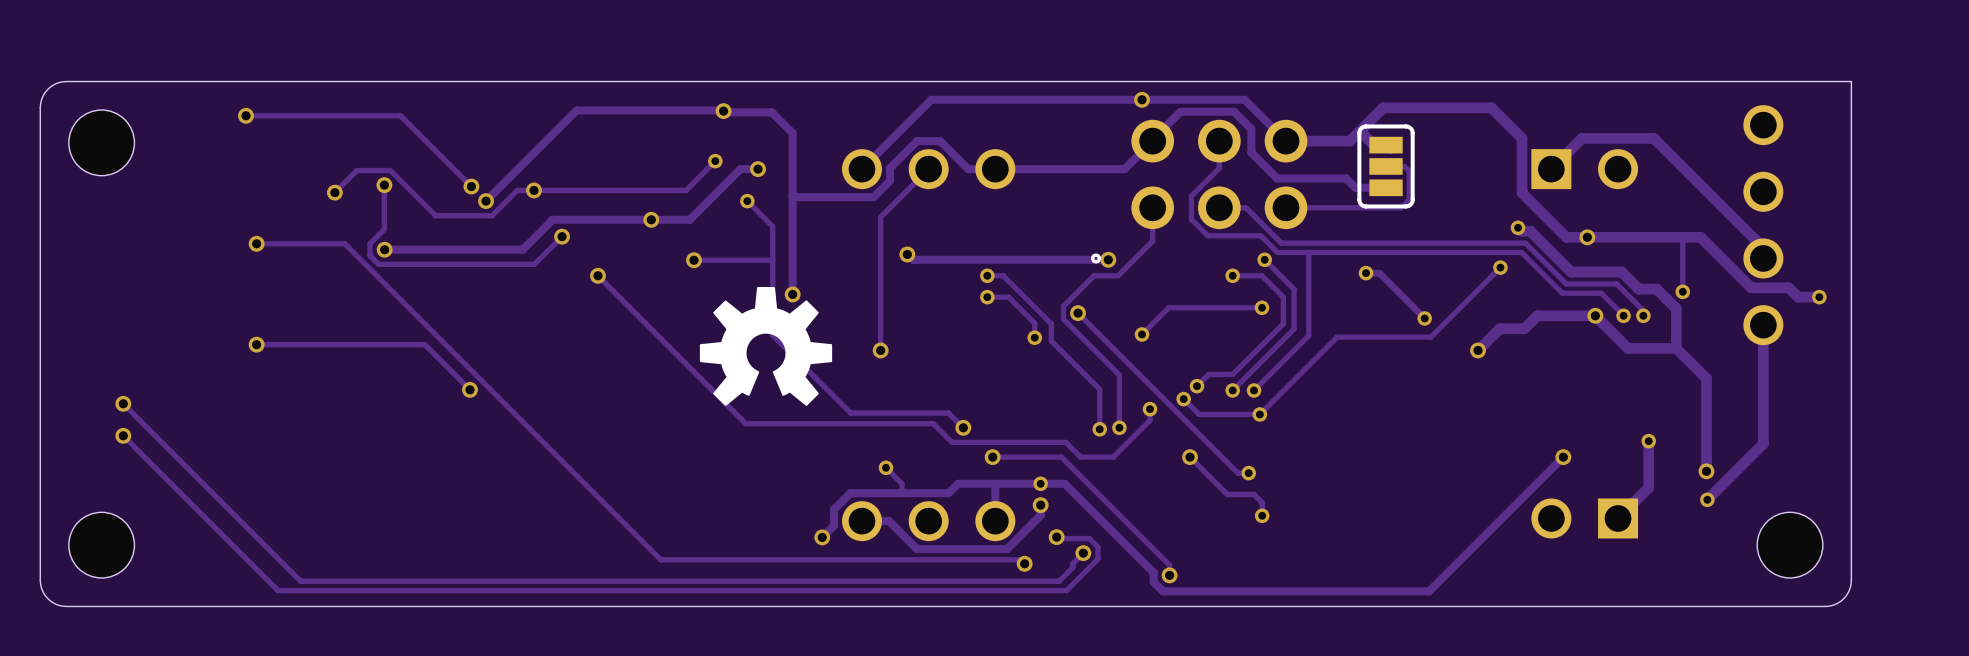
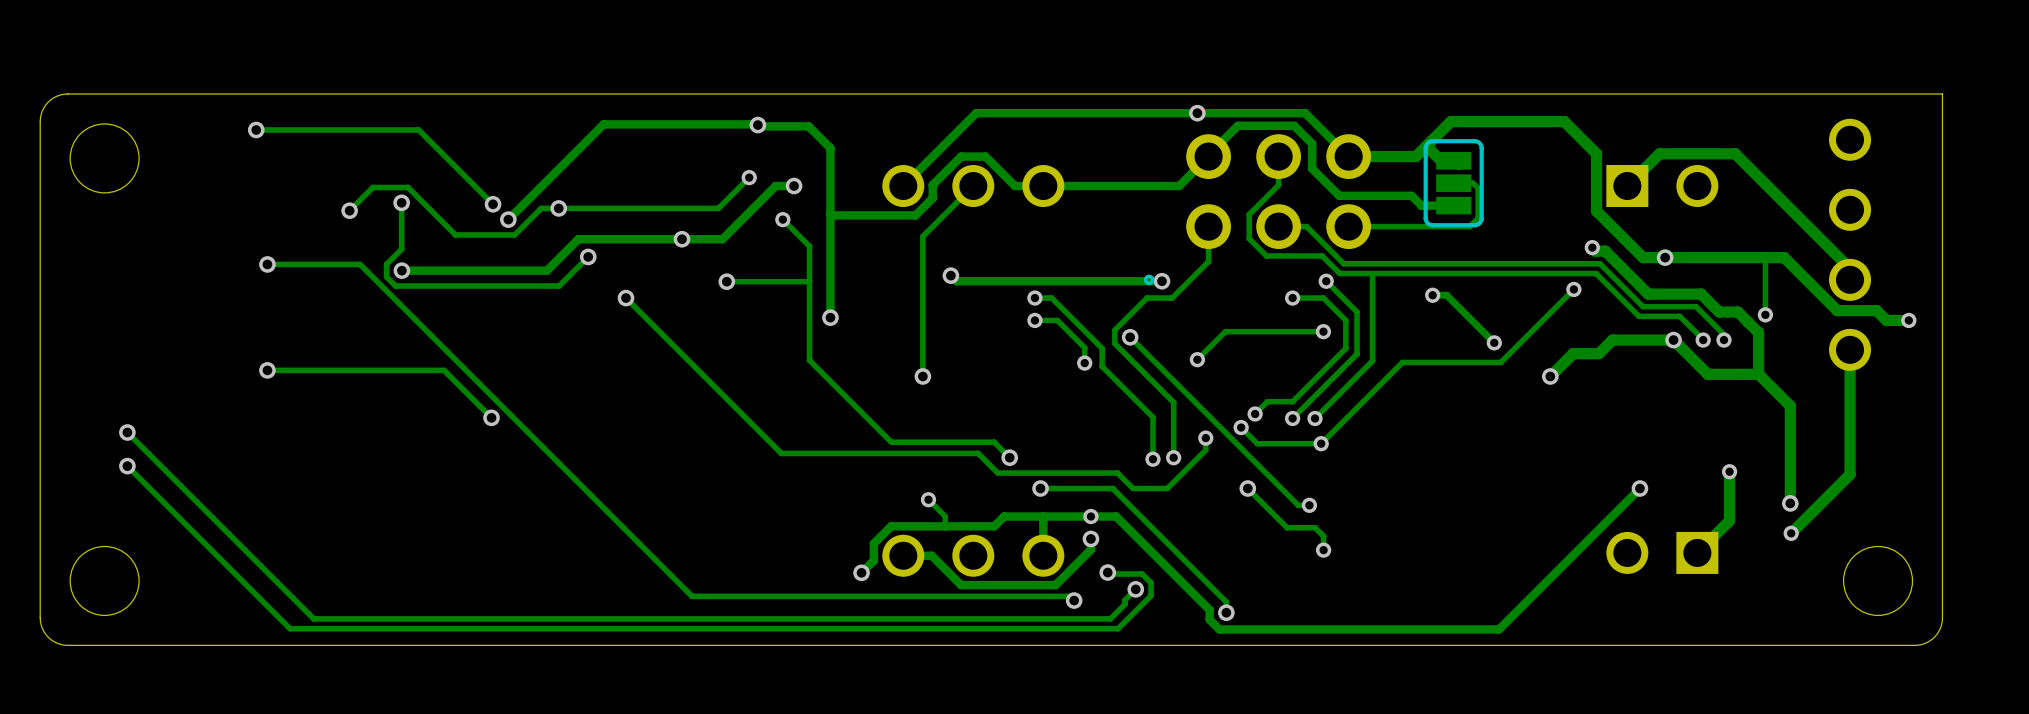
drawing: [699, 287, 833, 406] -> none

